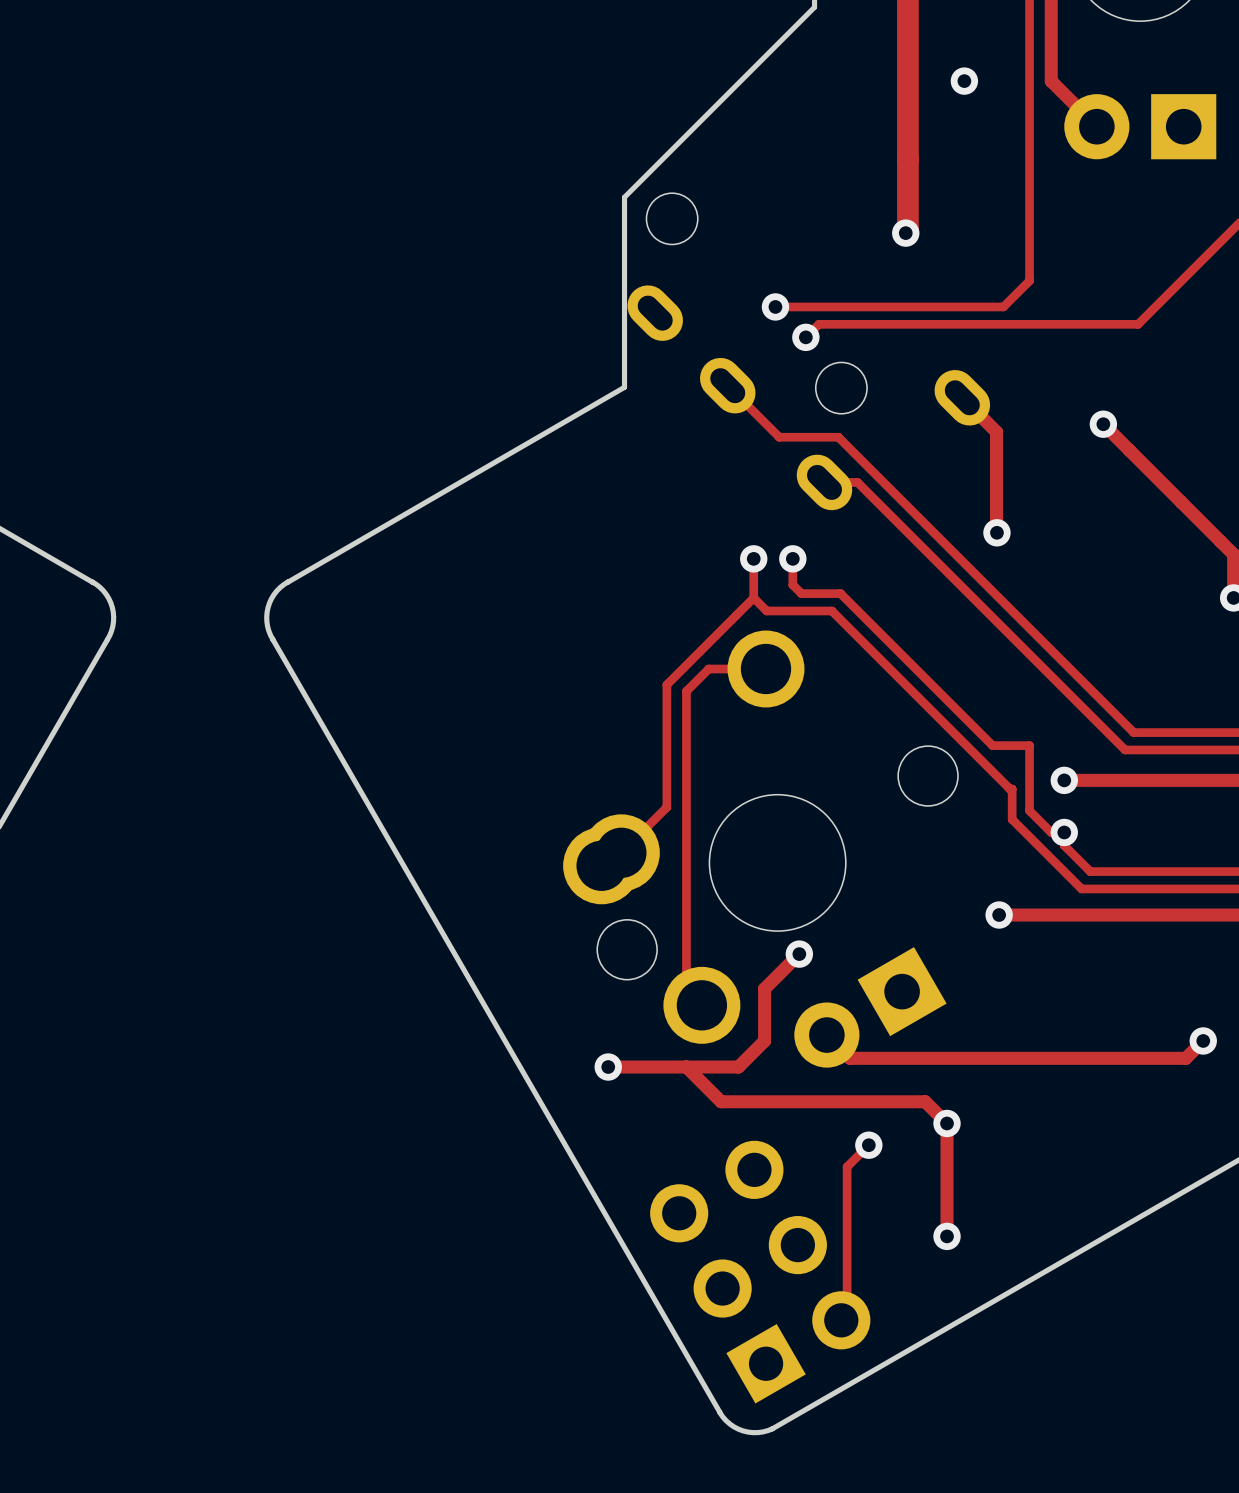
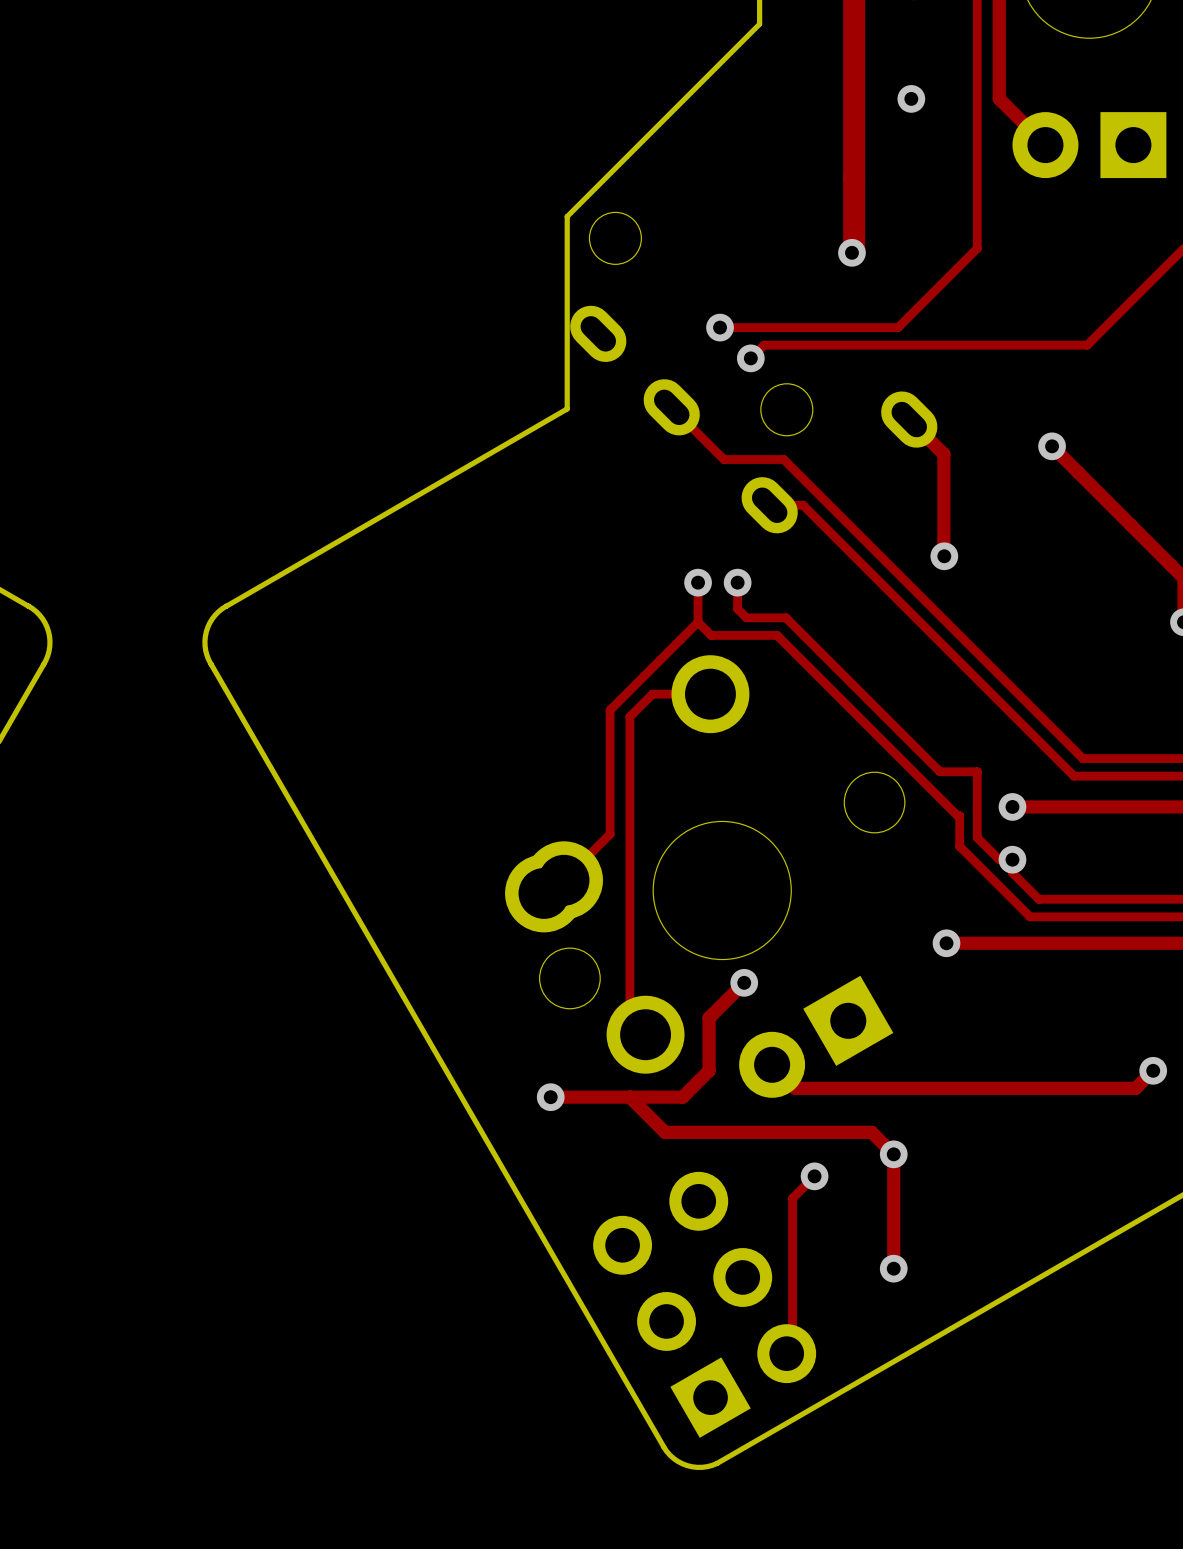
track: (1029, 228) (1029, 280) (1003, 306) (951, 306) -> (977, 248) (898, 327)

